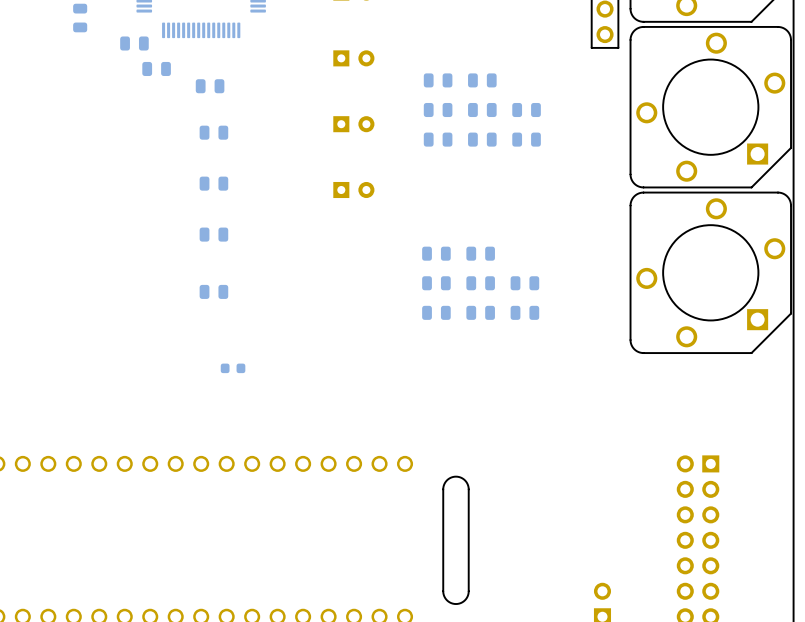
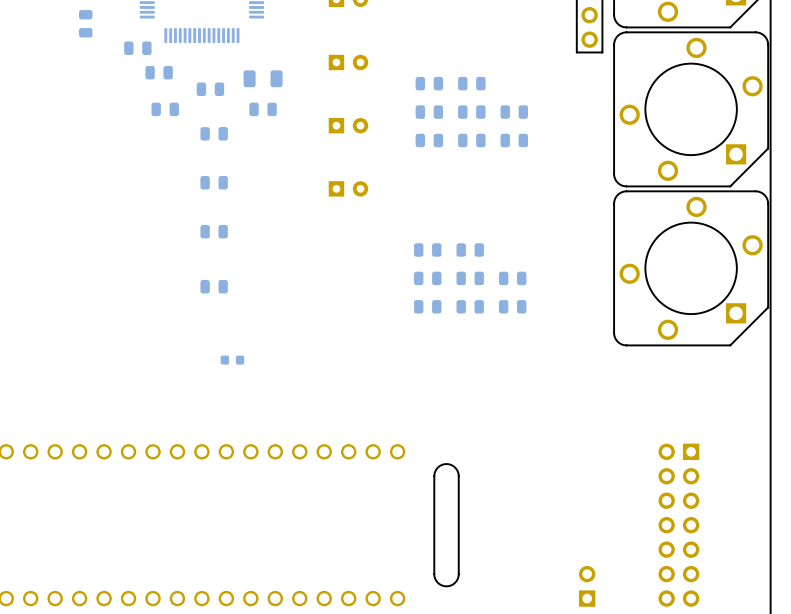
part: none -> (263, 78)
part: none -> (165, 109)
part: none -> (263, 109)

